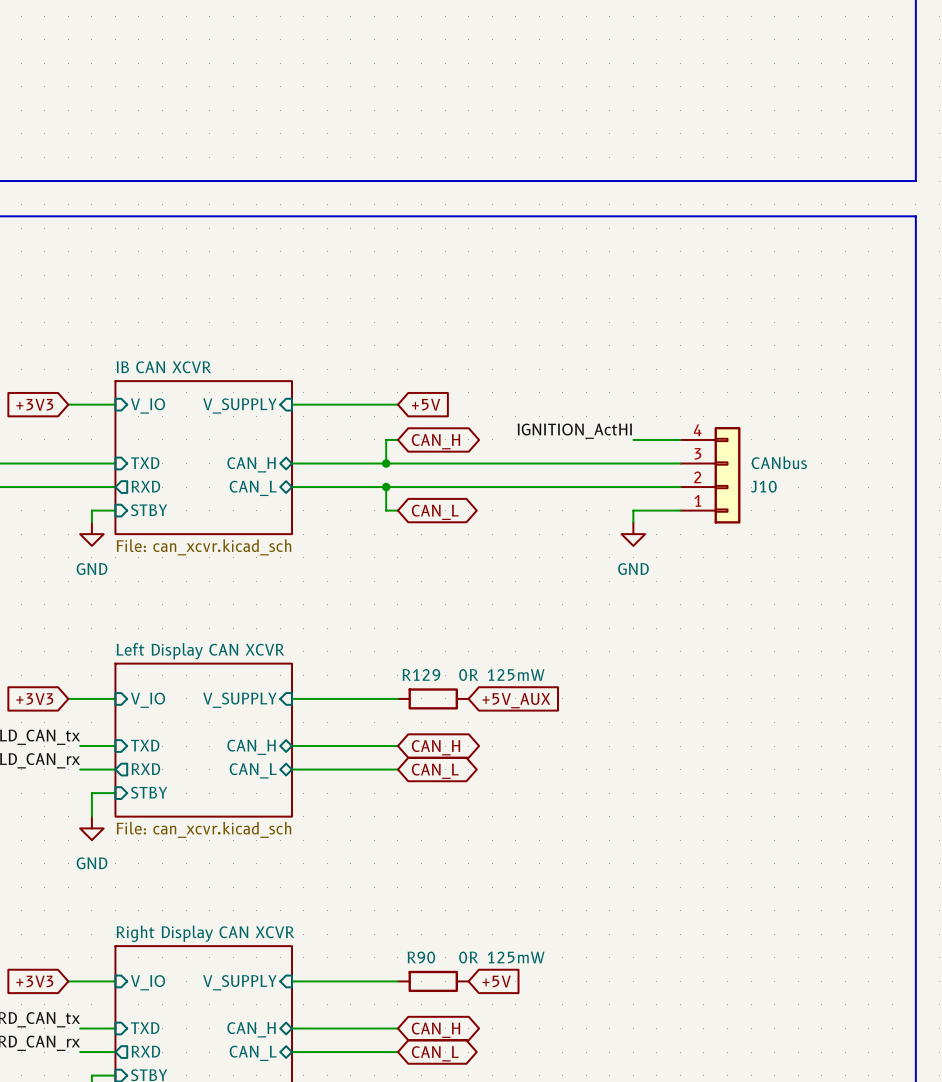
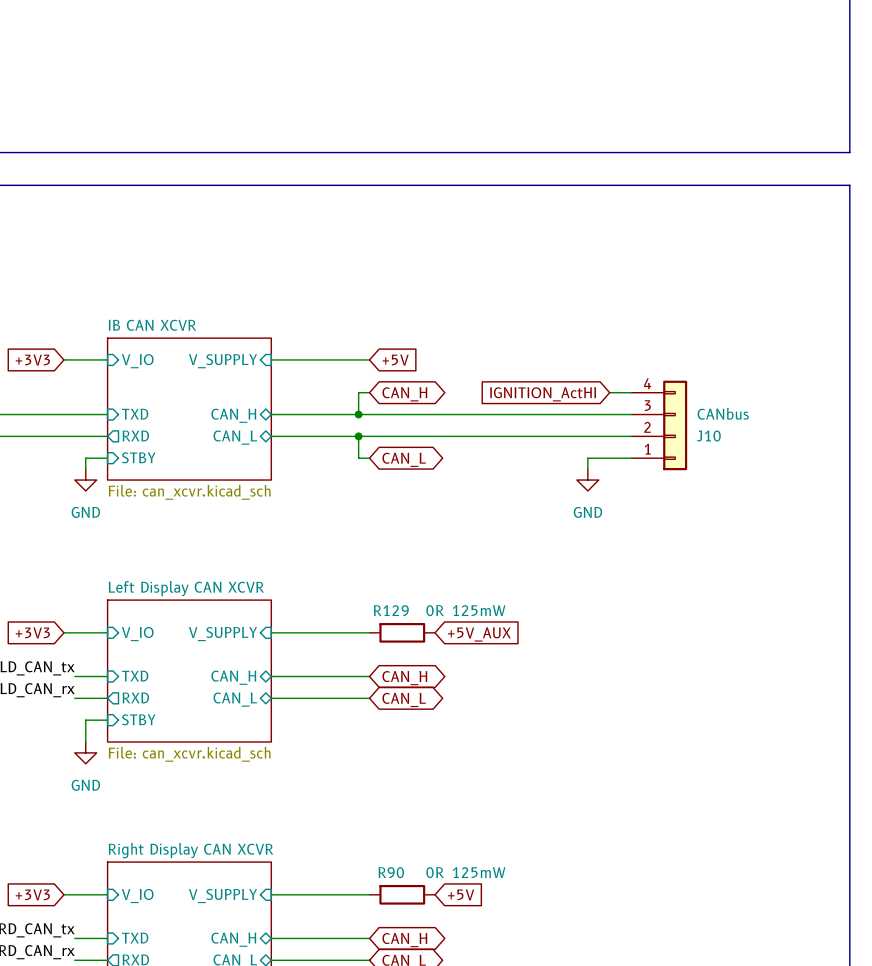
label: IGNITION_ActHI (574, 431) -> none
wire: (633, 439) (656, 439) -> none
global label: none -> IGNITION_ActHI (543, 394)

